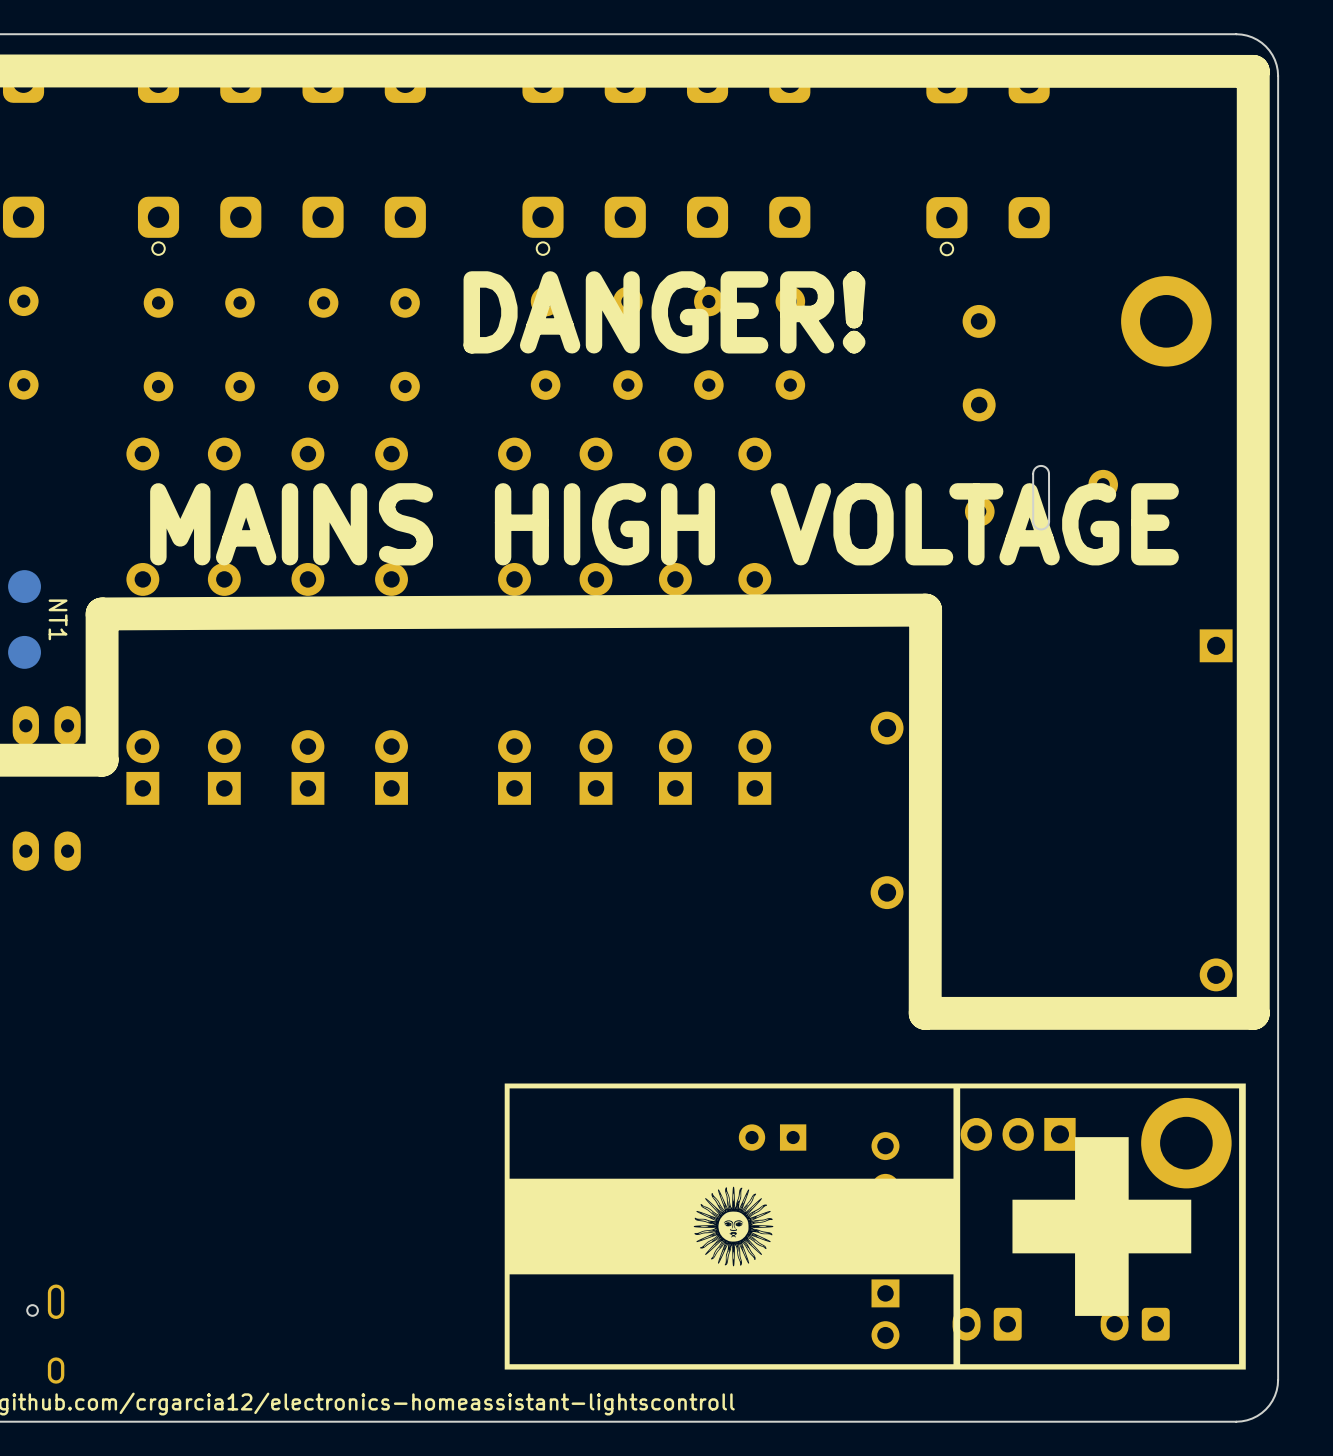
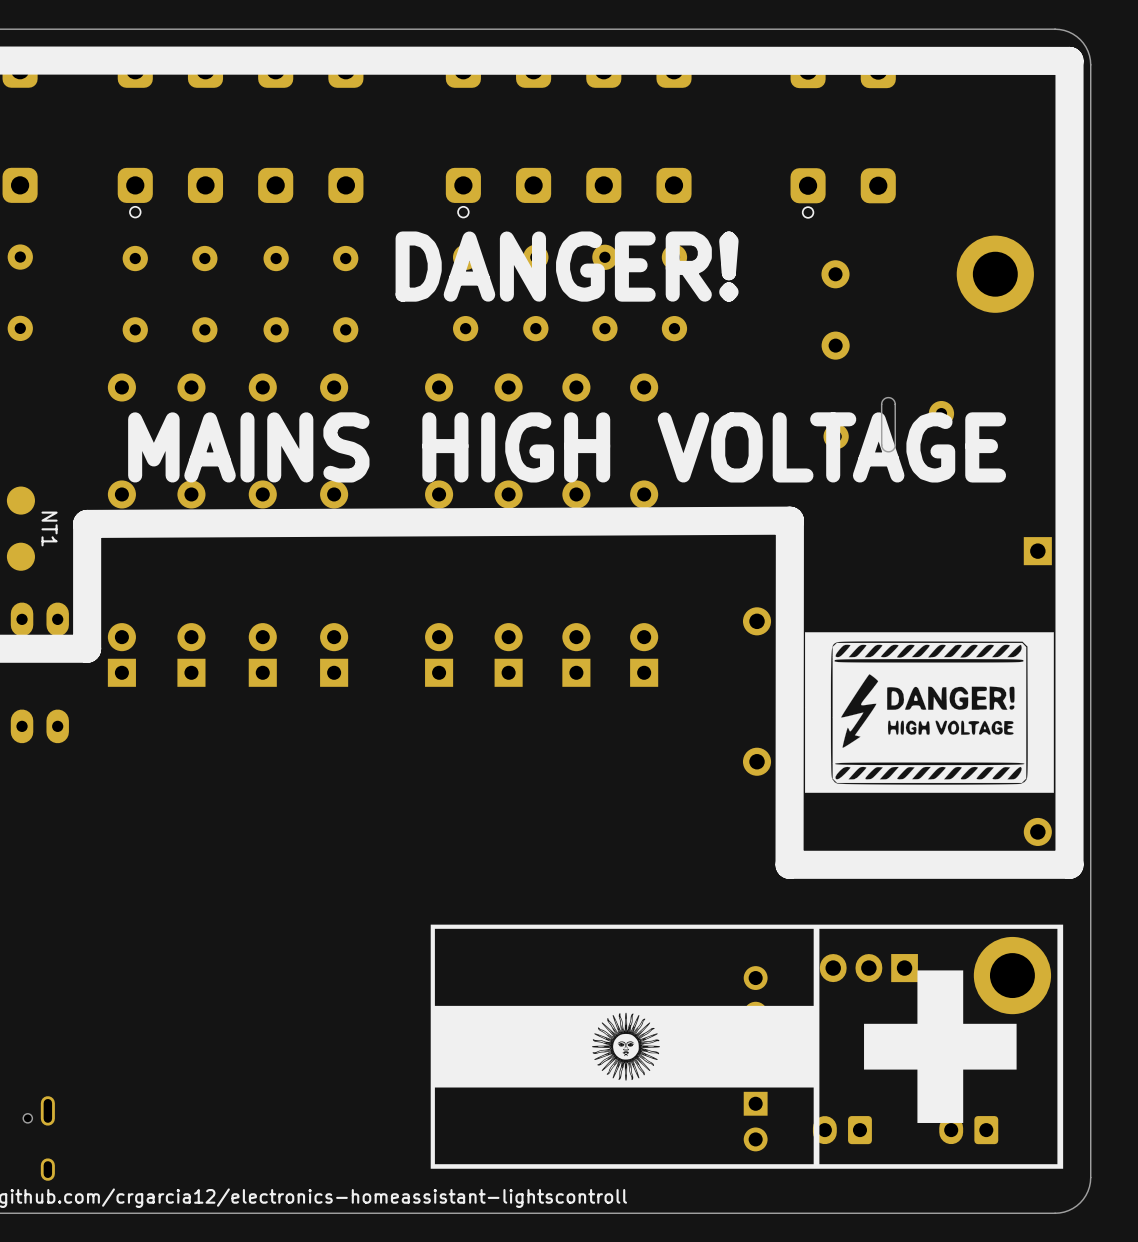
drawing: none -> [804, 632, 1054, 793]
part: (772, 1137) -> none

